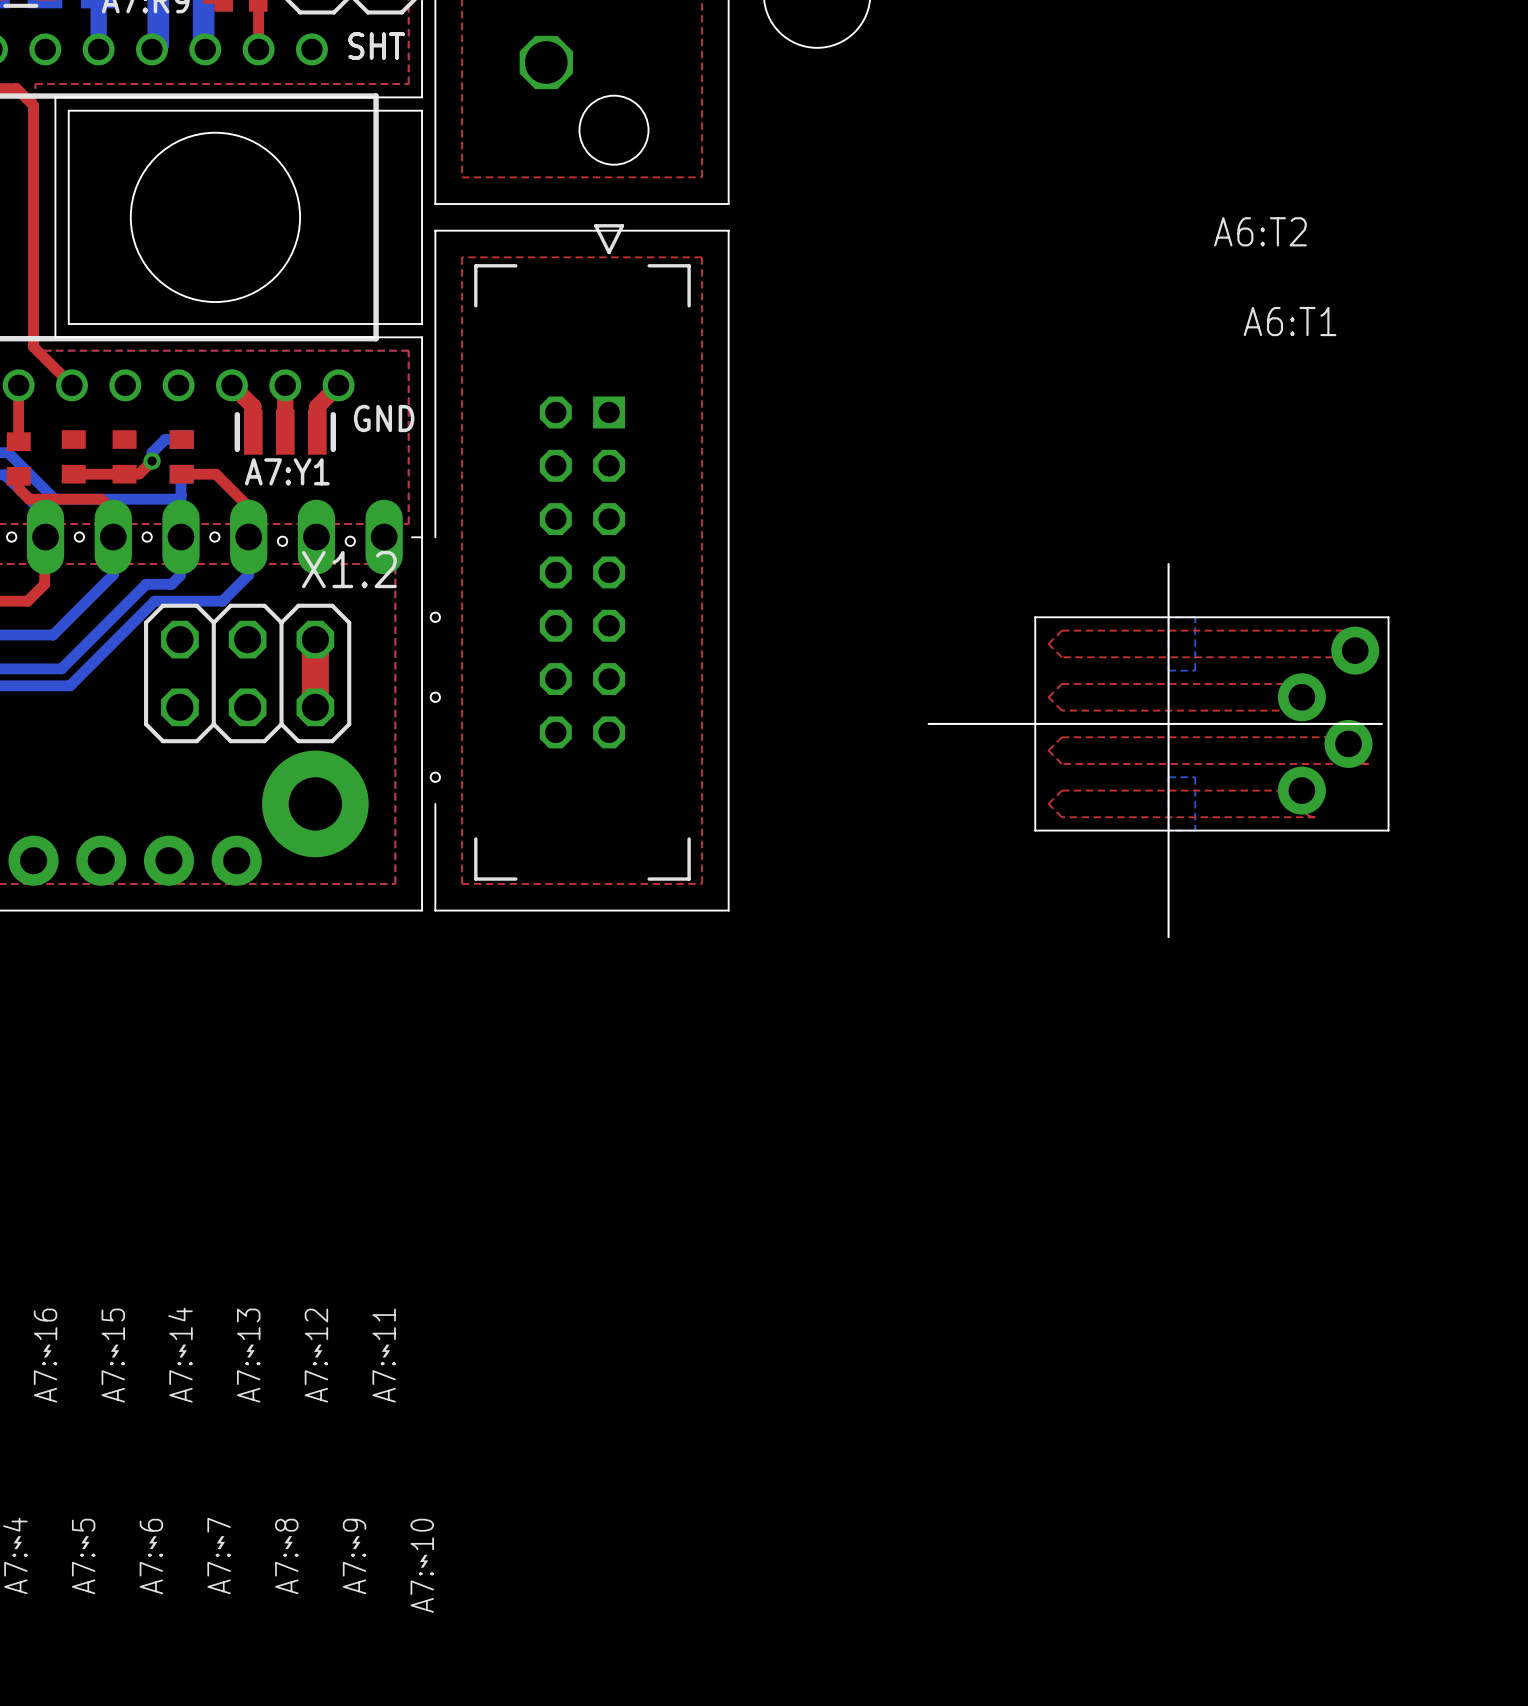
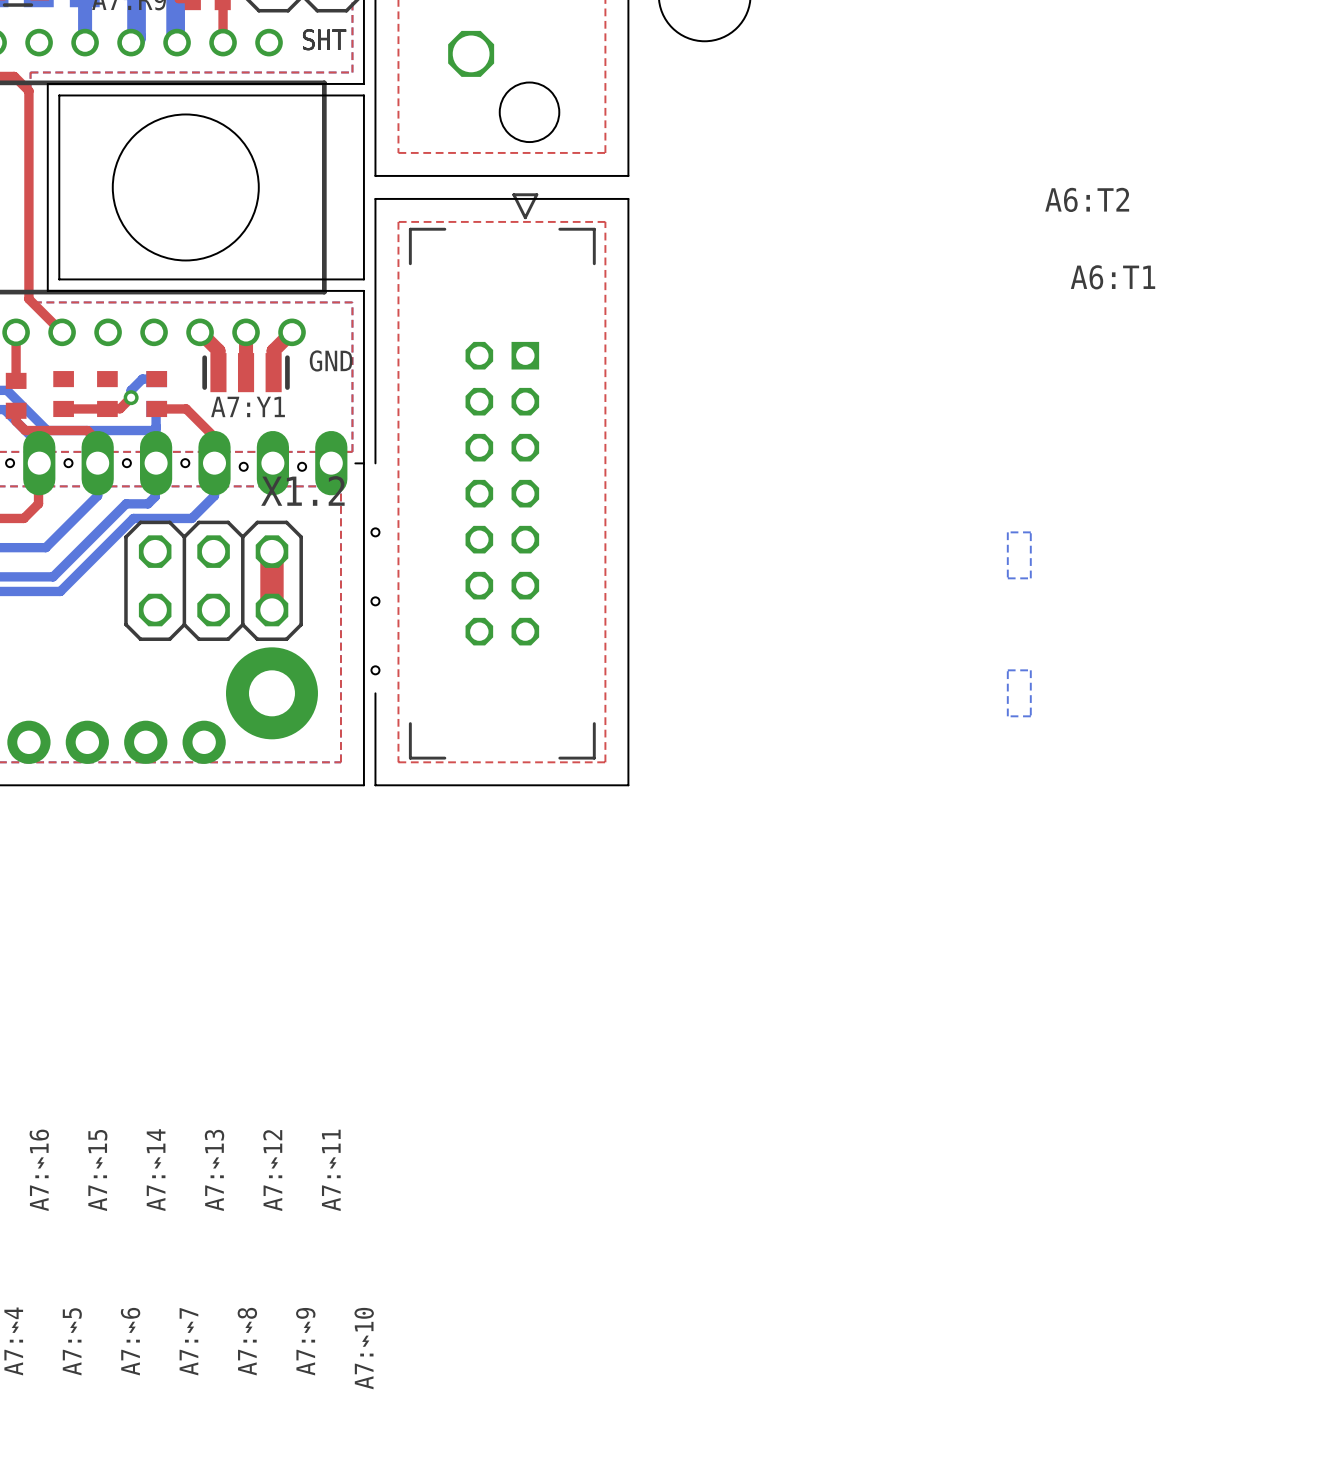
board edge: (1168, 563) (1168, 937) -> none
board edge: (1035, 617) (1035, 830) (1388, 830) (1388, 617) (1035, 617) -> none
top zone outline: (1061, 630) (1048, 643) (1061, 657) (1368, 657) (1359, 653) (1355, 643) (1359, 634) (1368, 630) (1061, 630) -> none
via: (1355, 650) -> none
top zone outline: (1061, 683) (1048, 697) (1061, 710) (1315, 710) (1305, 706) (1301, 697) (1305, 687) (1315, 683) (1061, 683) -> none
via: (1301, 697) -> none
board edge: (928, 723) (1381, 723) -> none
top zone outline: (1061, 737) (1048, 750) (1061, 763) (1368, 763) (1359, 760) (1355, 750) (1359, 741) (1368, 737) (1061, 737) -> none
via: (1348, 743) -> none
top zone outline: (1061, 790) (1048, 803) (1061, 817) (1315, 817) (1305, 813) (1301, 803) (1305, 794) (1315, 790) (1061, 790) -> none
via: (1301, 790) -> none

